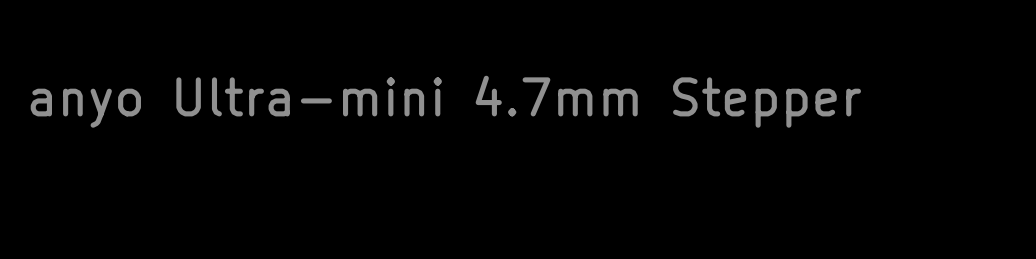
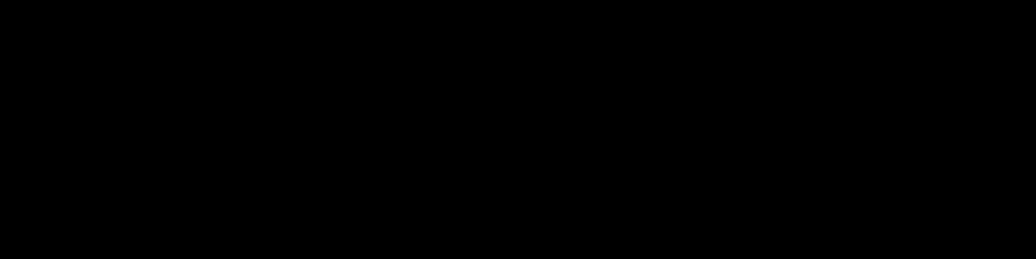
text: anyo Ultra-mini 4.7mm Stepper (445, 101) -> none

